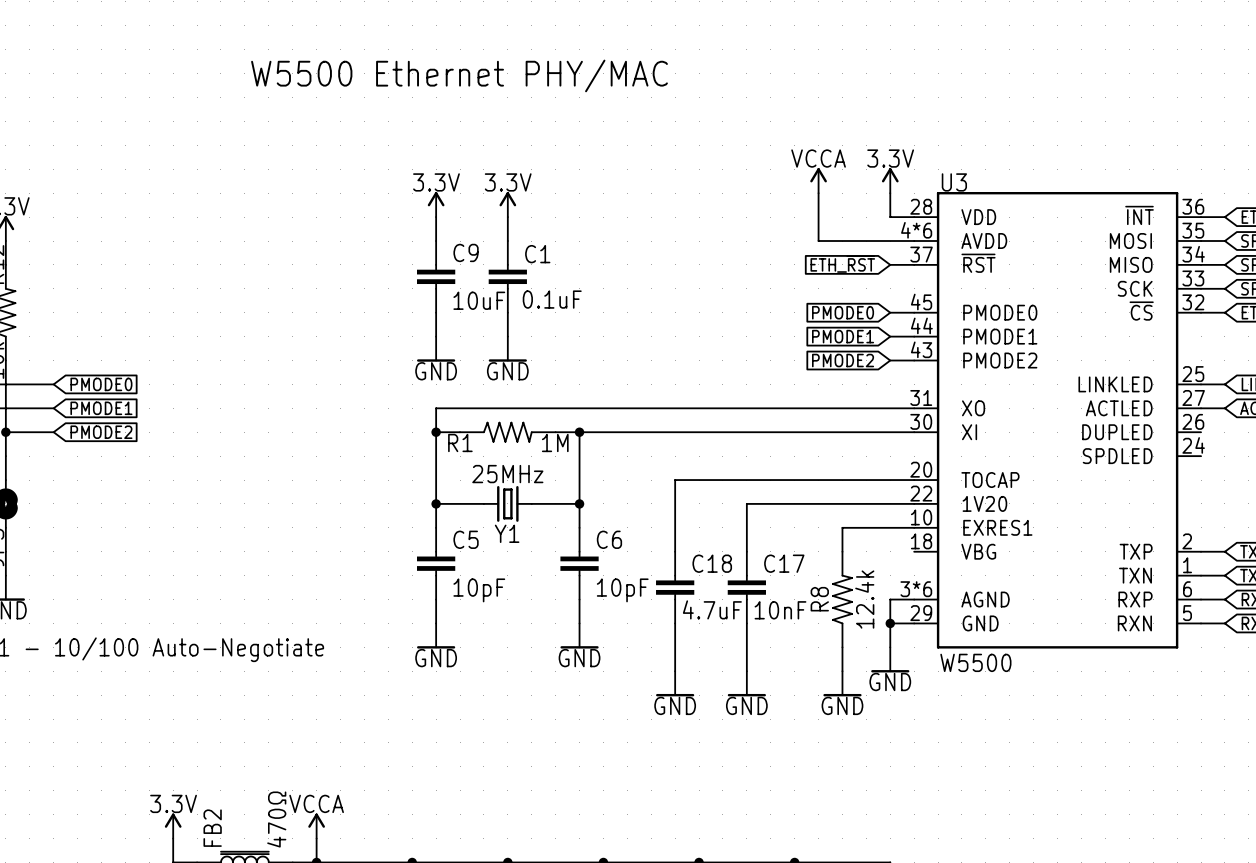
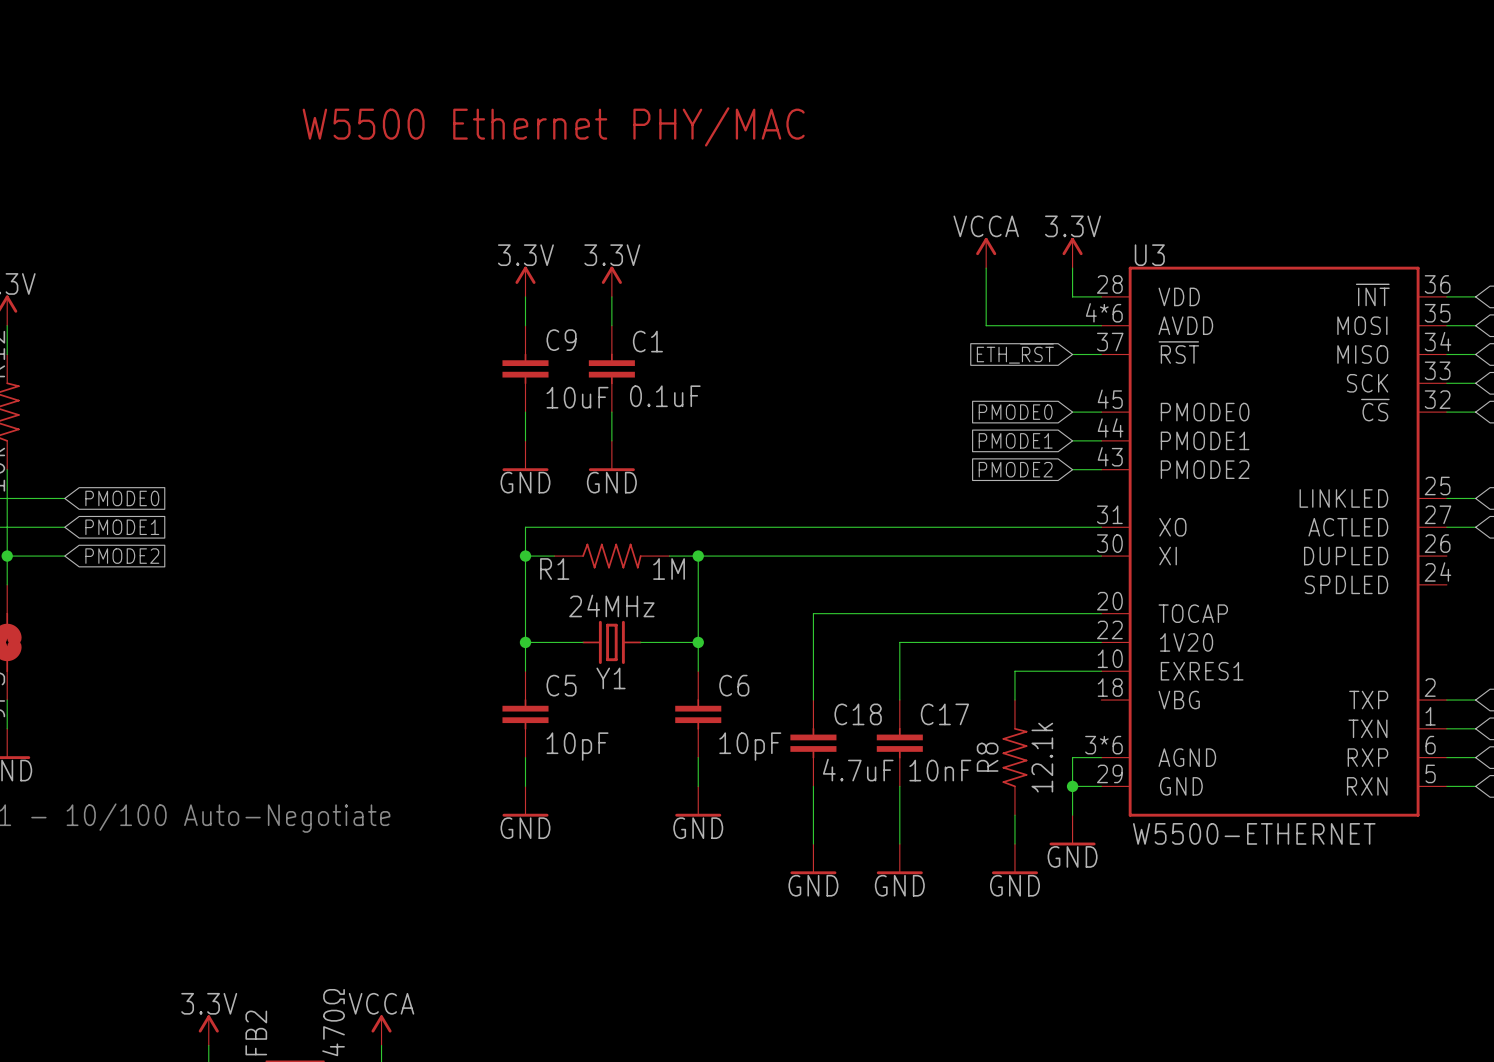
Y1 value: 25MHz (507, 474) -> 24MHz (611, 605)
R8 value: 12.4k (864, 599) -> 12.1k (1042, 757)
U3 value: W5500 (975, 662) -> W5500-ETHERNET (1254, 833)

